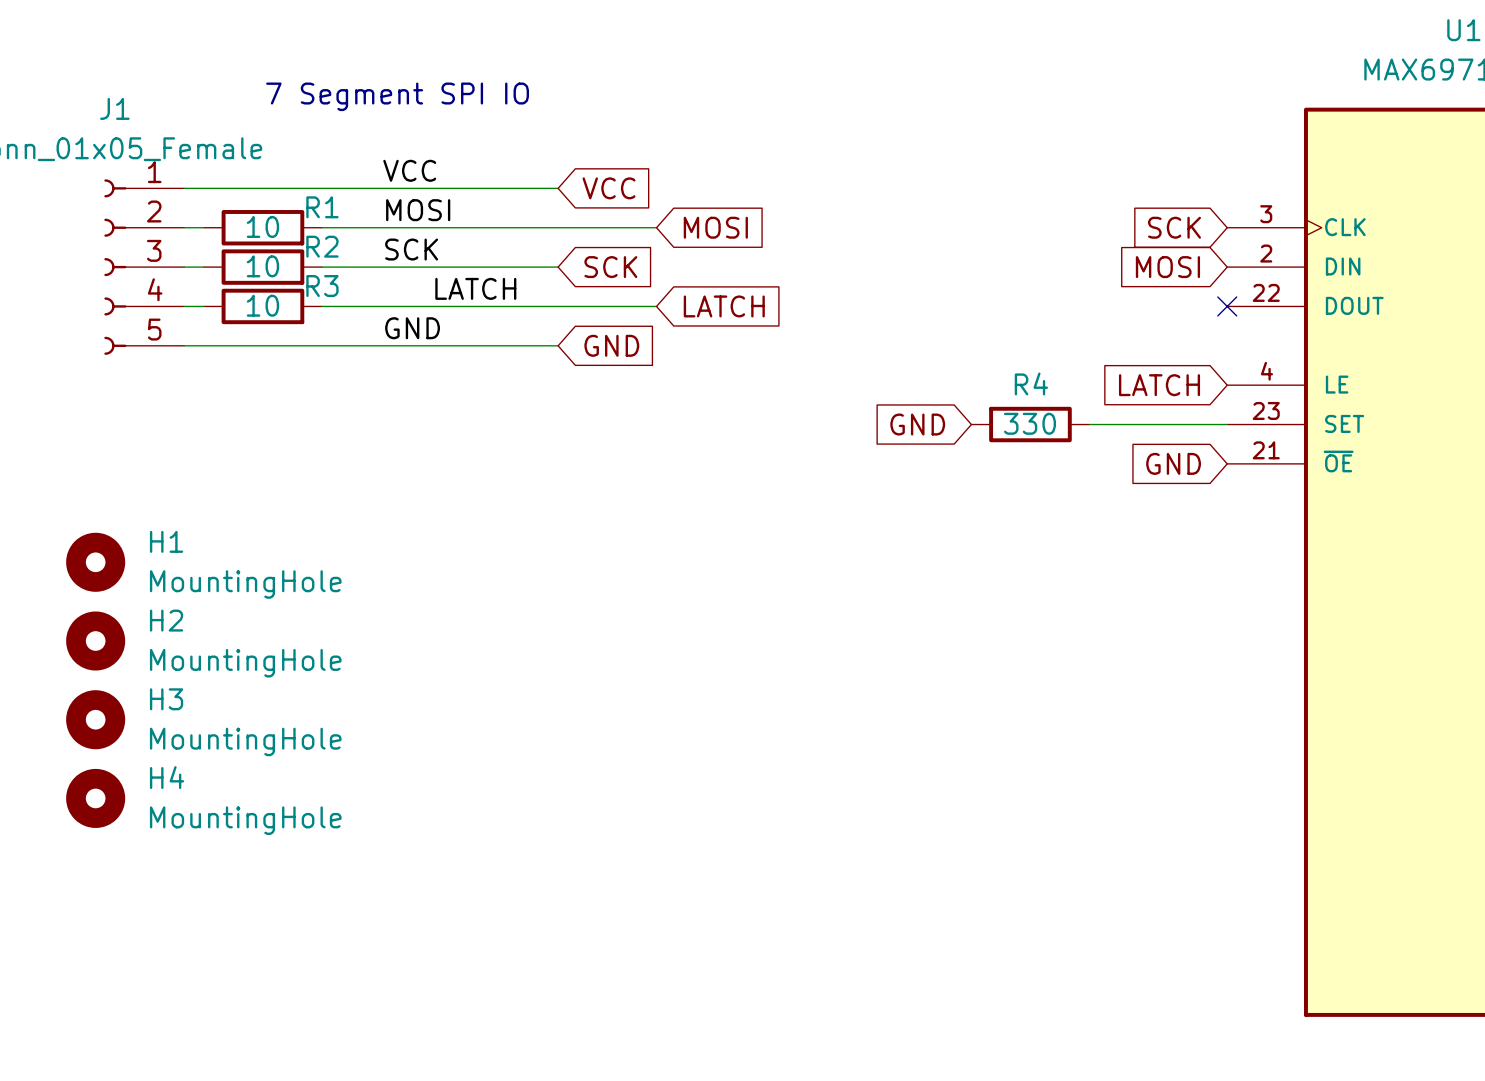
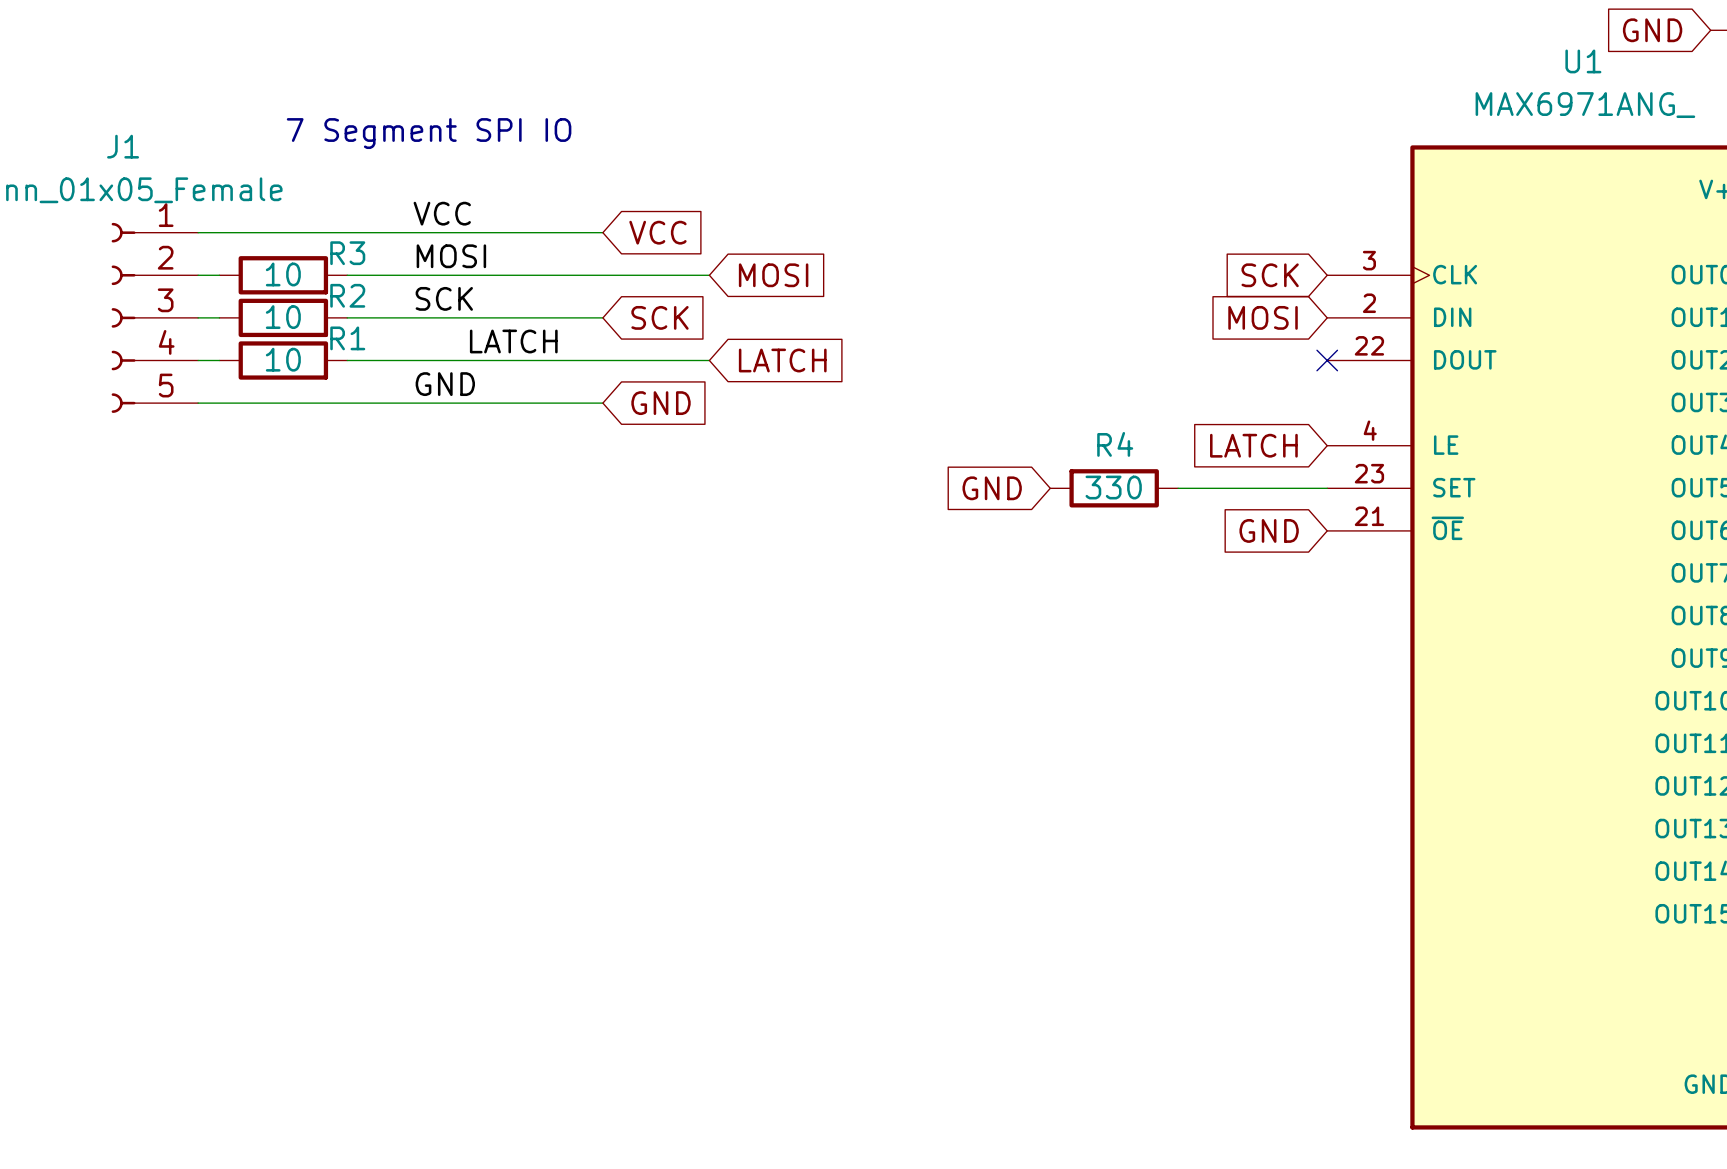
R1 name: R1 (322, 207) -> R3 (347, 253)
R3 name: R3 (322, 286) -> R1 (347, 338)
H1: MountingHole (95, 562) -> none
H2: MountingHole (95, 641) -> none
H3: MountingHole (95, 719) -> none
H4: MountingHole (95, 798) -> none

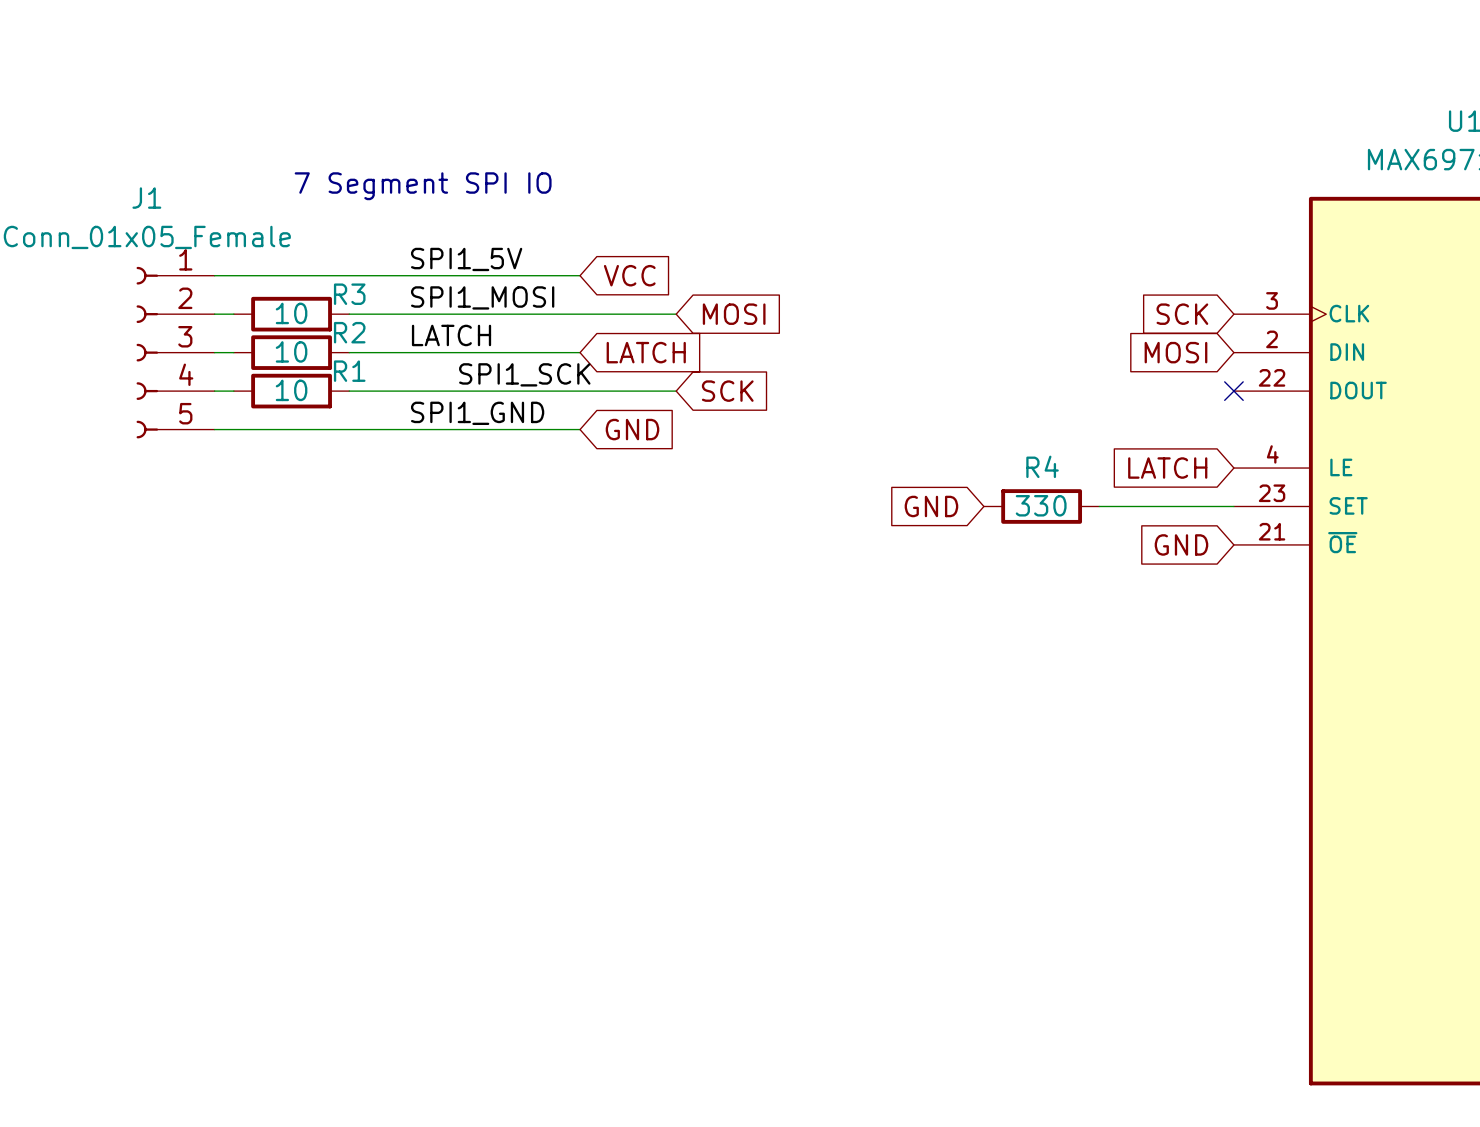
label: VCC (442, 213) -> SPI1_5V (466, 259)
label: MOSI (451, 256) -> SPI1_MOSI (482, 297)
label: SCK (444, 298) -> LATCH (451, 335)
global label: SCK (659, 317) -> LATCH (646, 352)
label: LATCH (513, 341) -> SPI1_SCK (524, 374)
global label: LATCH (782, 360) -> SCK (727, 391)
label: GND (445, 384) -> SPI1_GND (477, 413)

